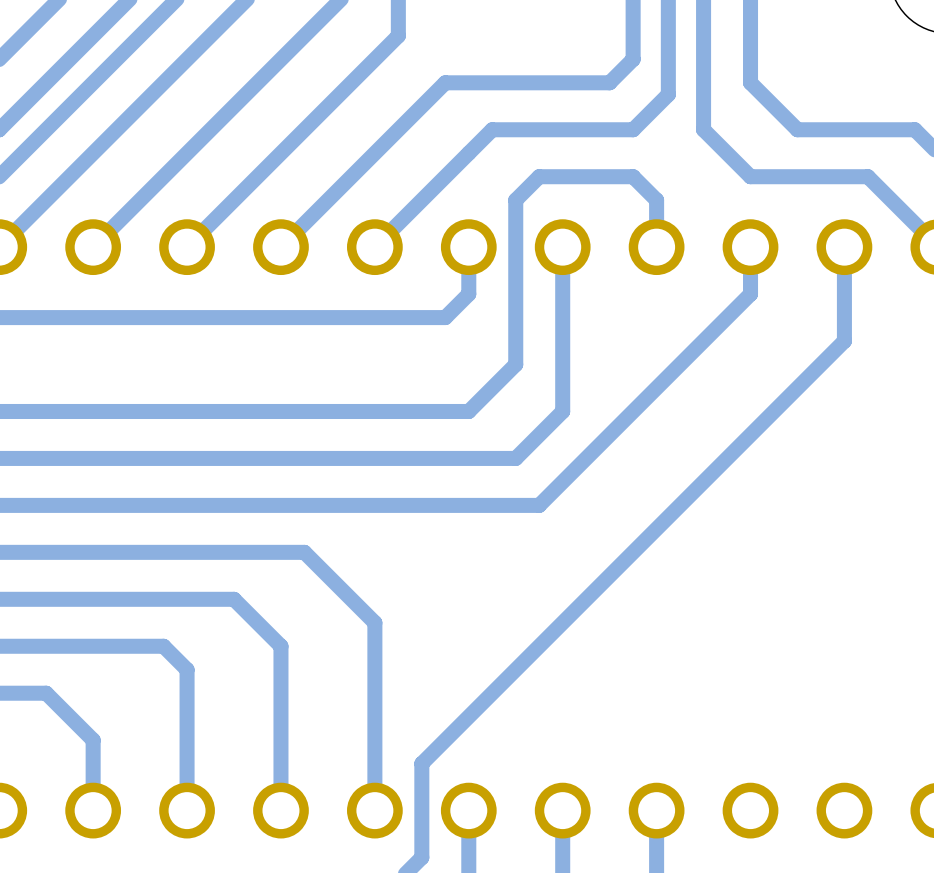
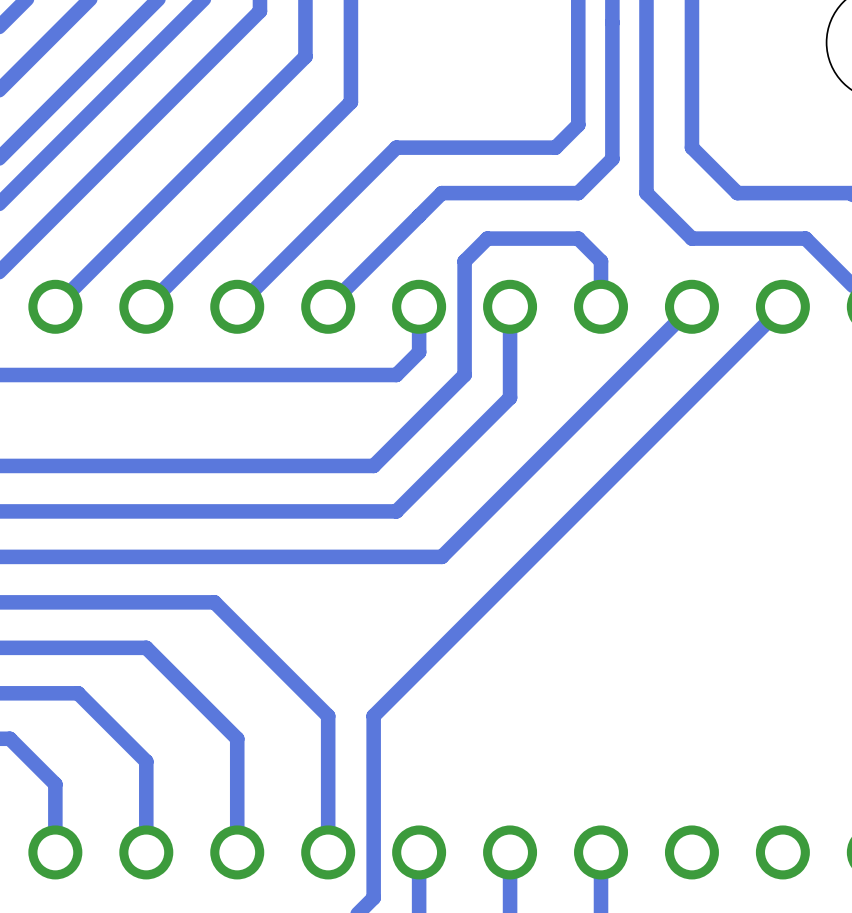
bottom track: (750, 247) (750, 294) (539, 505) (492, 505) -> (691, 306) (441, 556)
bottom track: (844, 247) (844, 341) (421, 763) -> (782, 306) (373, 716) (373, 806)
bottom track: (515, 317) (515, 364) (468, 411) (421, 411) -> (464, 375) (373, 465)
bottom track: (562, 341) (562, 411) (515, 458) (445, 458) -> (510, 397) (396, 511)
bottom track: (257, 552) (304, 552) (374, 622) (374, 669) -> (214, 602) (328, 716)
bottom track: (187, 599) (234, 599) (280, 646) (280, 693) -> (146, 647) (237, 738)
bottom track: (116, 646) (163, 646) (187, 669) (187, 716) -> (78, 693) (146, 761)

